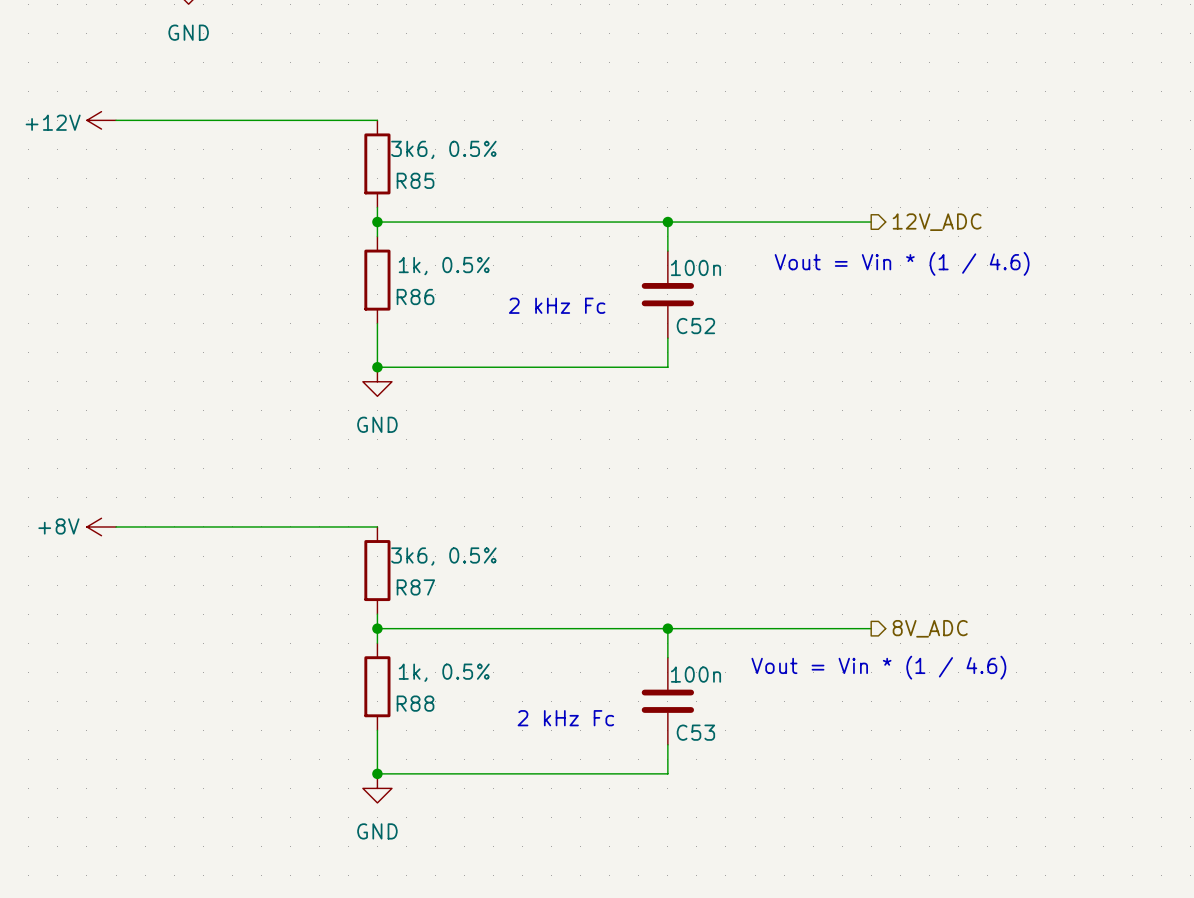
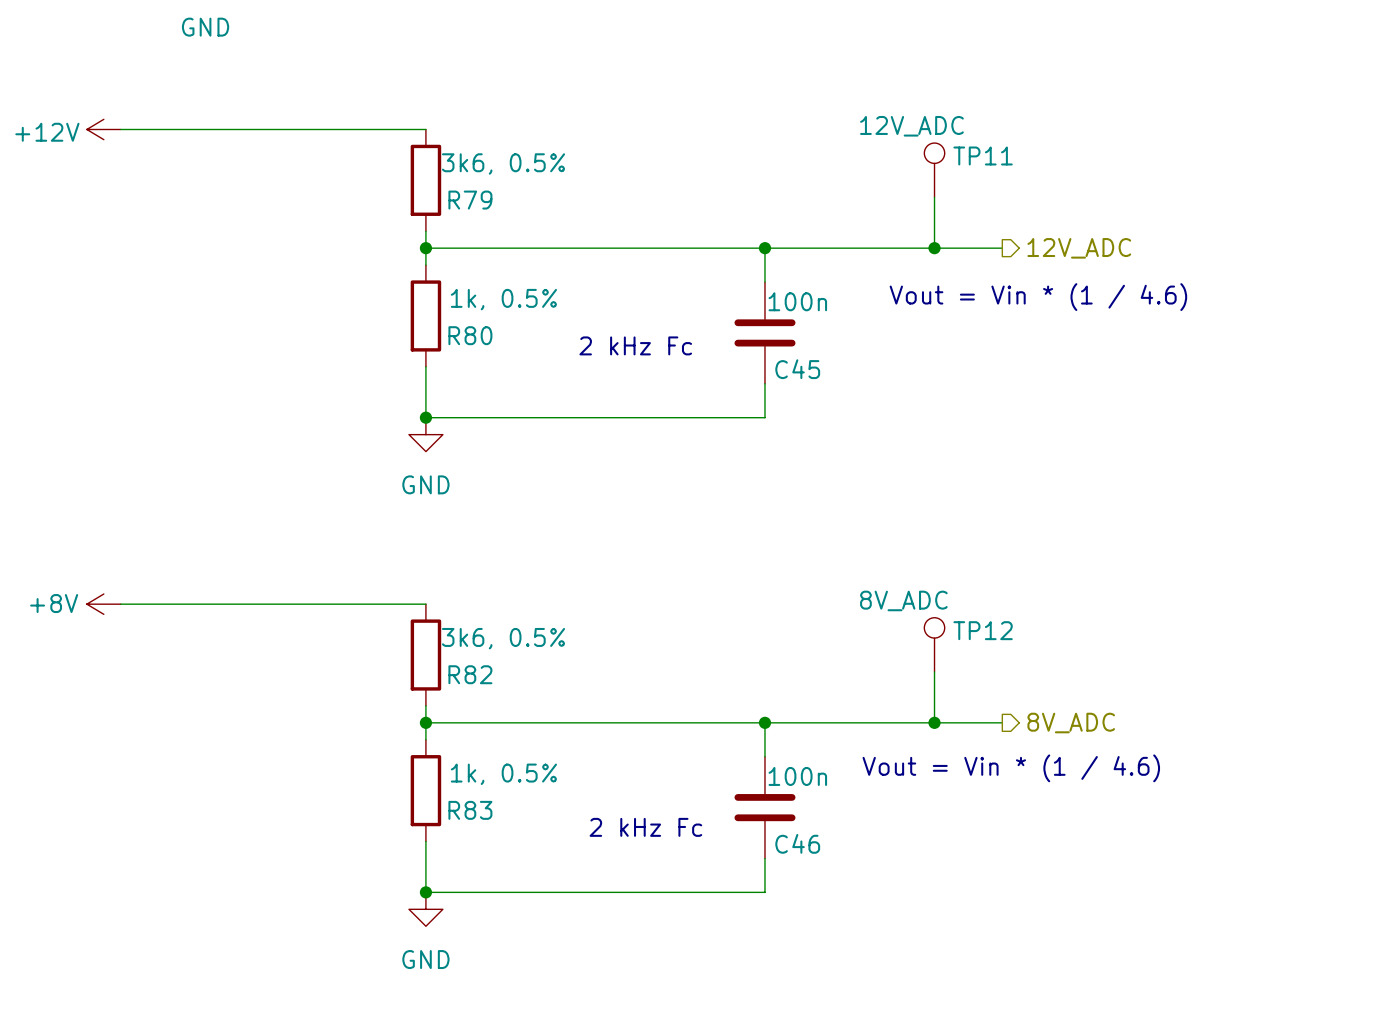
TP11: none -> 12V_ADC (934, 170)
wire: none -> (934, 197) (934, 248)
R85 name: R85 (415, 180) -> R79 (470, 200)
junction: none -> (934, 248)
R86 name: R86 (415, 296) -> R80 (470, 335)
C52 name: C52 (695, 326) -> C45 (797, 369)
TP12: none -> 8V_ADC (934, 644)
wire: none -> (934, 671) (934, 722)
R87 name: R87 (415, 587) -> R82 (470, 674)
junction: none -> (934, 722)
R88 name: R88 (415, 703) -> R83 (470, 810)
C53 name: C53 (695, 732) -> C46 (797, 843)

